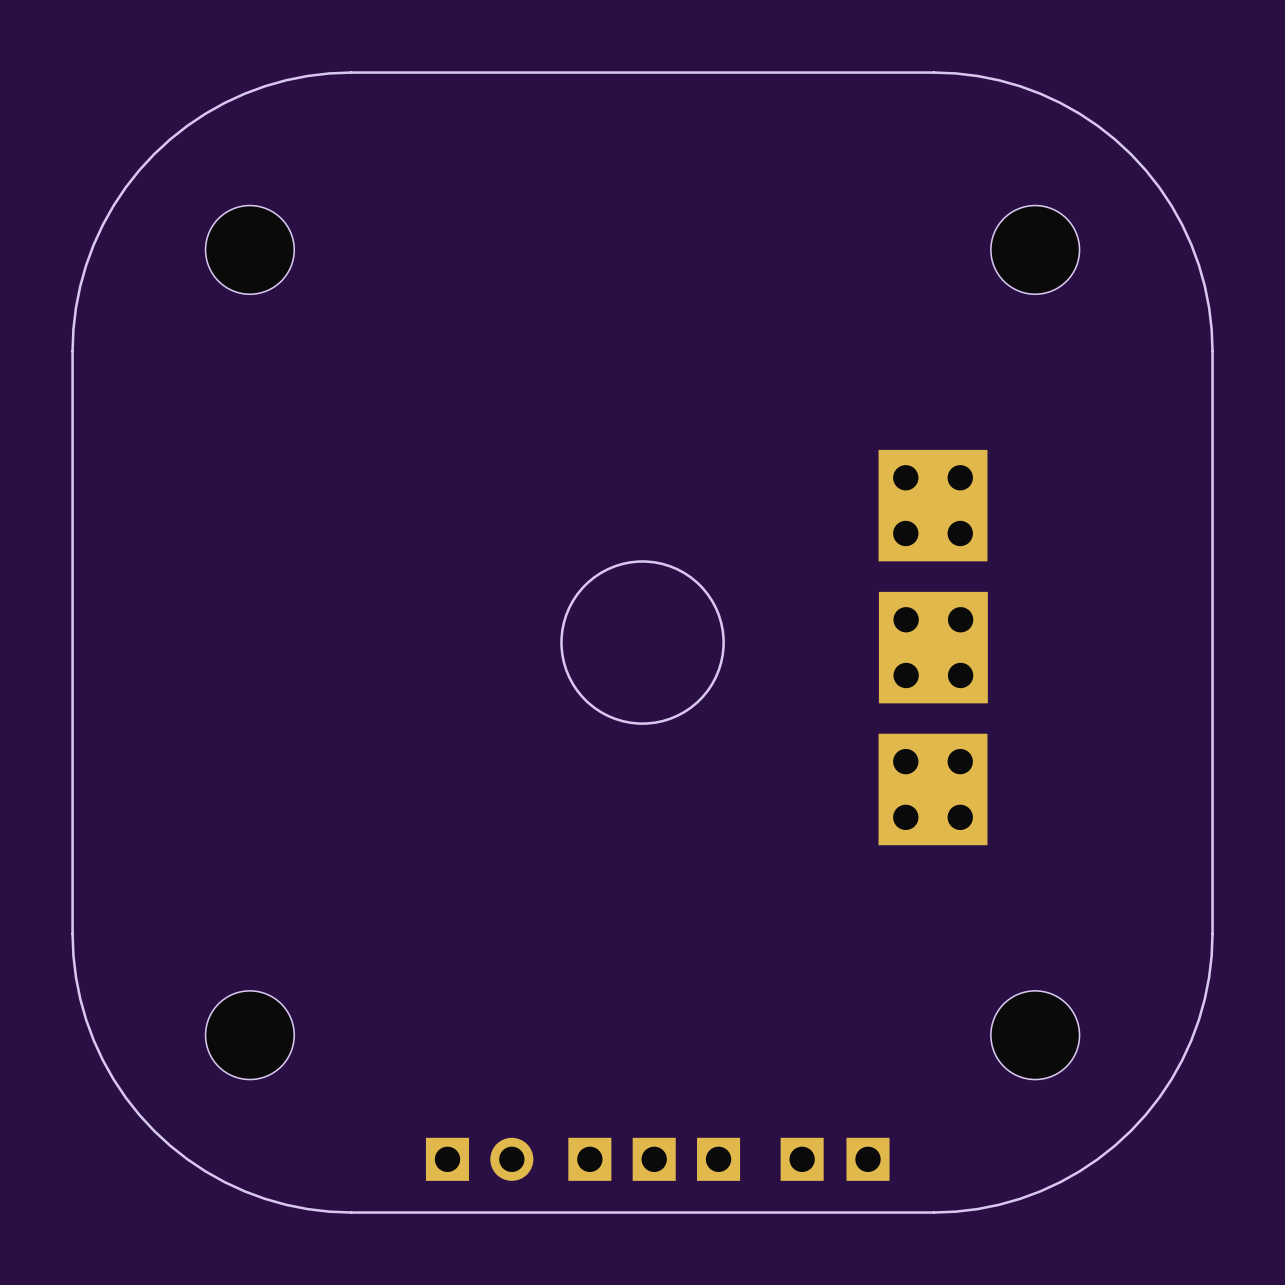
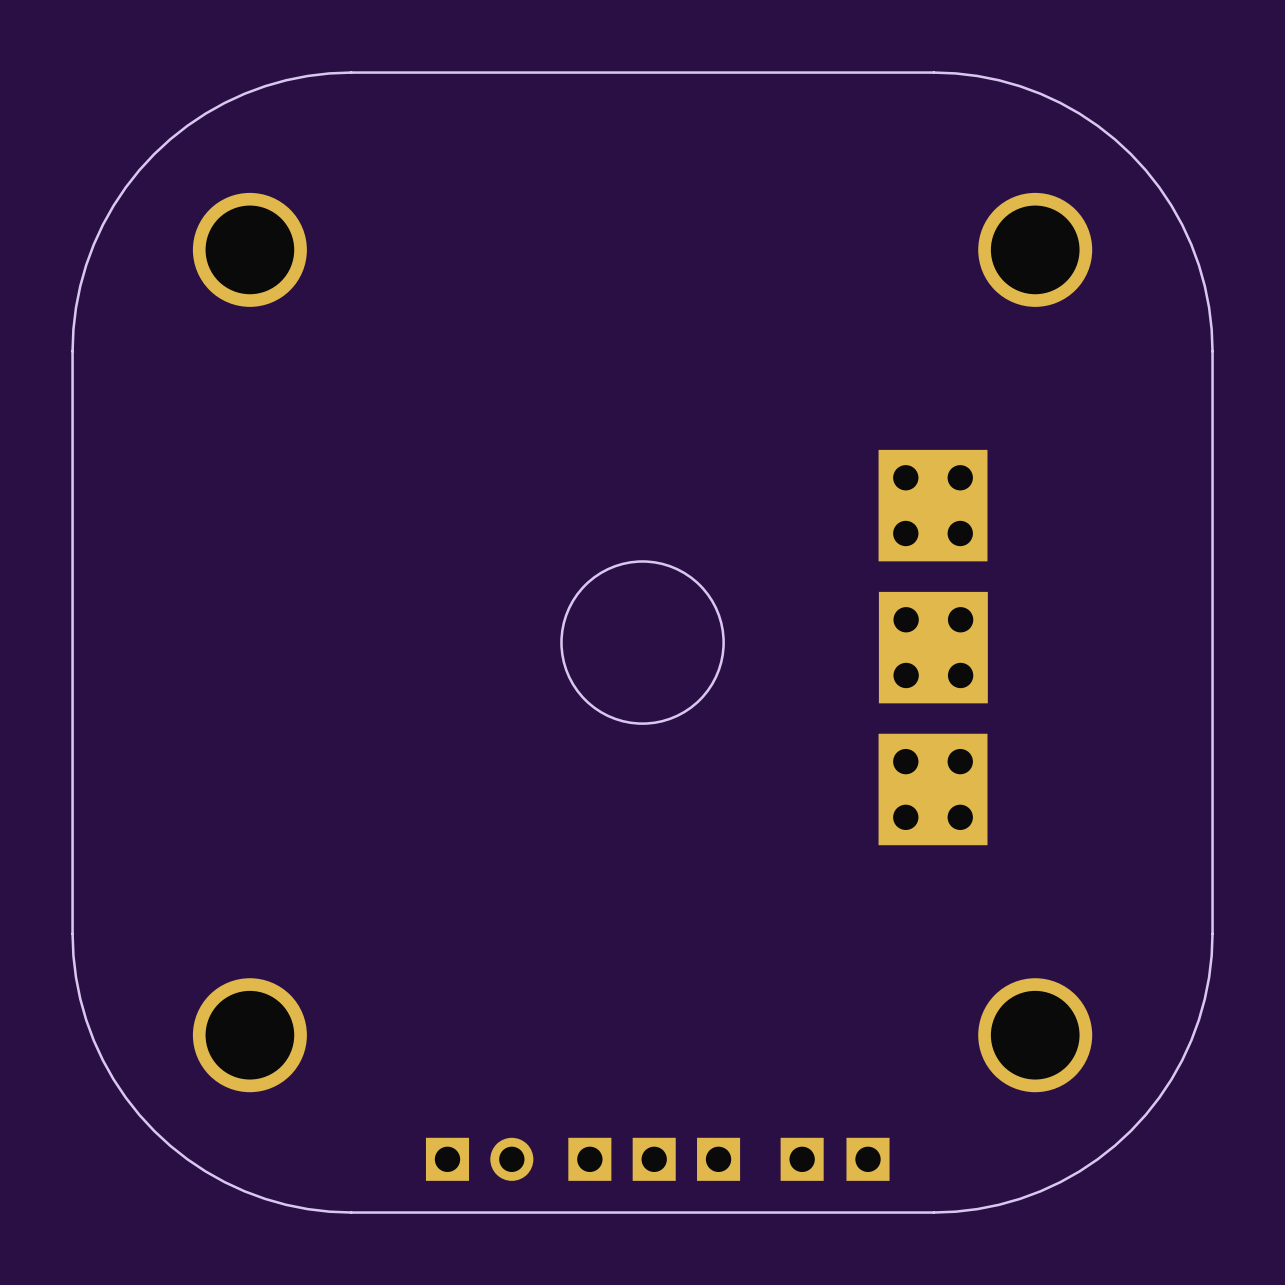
part footprint: [205, 205, 295, 295] -> [192, 192, 307, 307]
part footprint: [990, 205, 1080, 295] -> [978, 192, 1093, 307]
part footprint: [205, 990, 295, 1080] -> [192, 978, 307, 1093]
part footprint: [990, 990, 1080, 1080] -> [978, 978, 1093, 1093]

